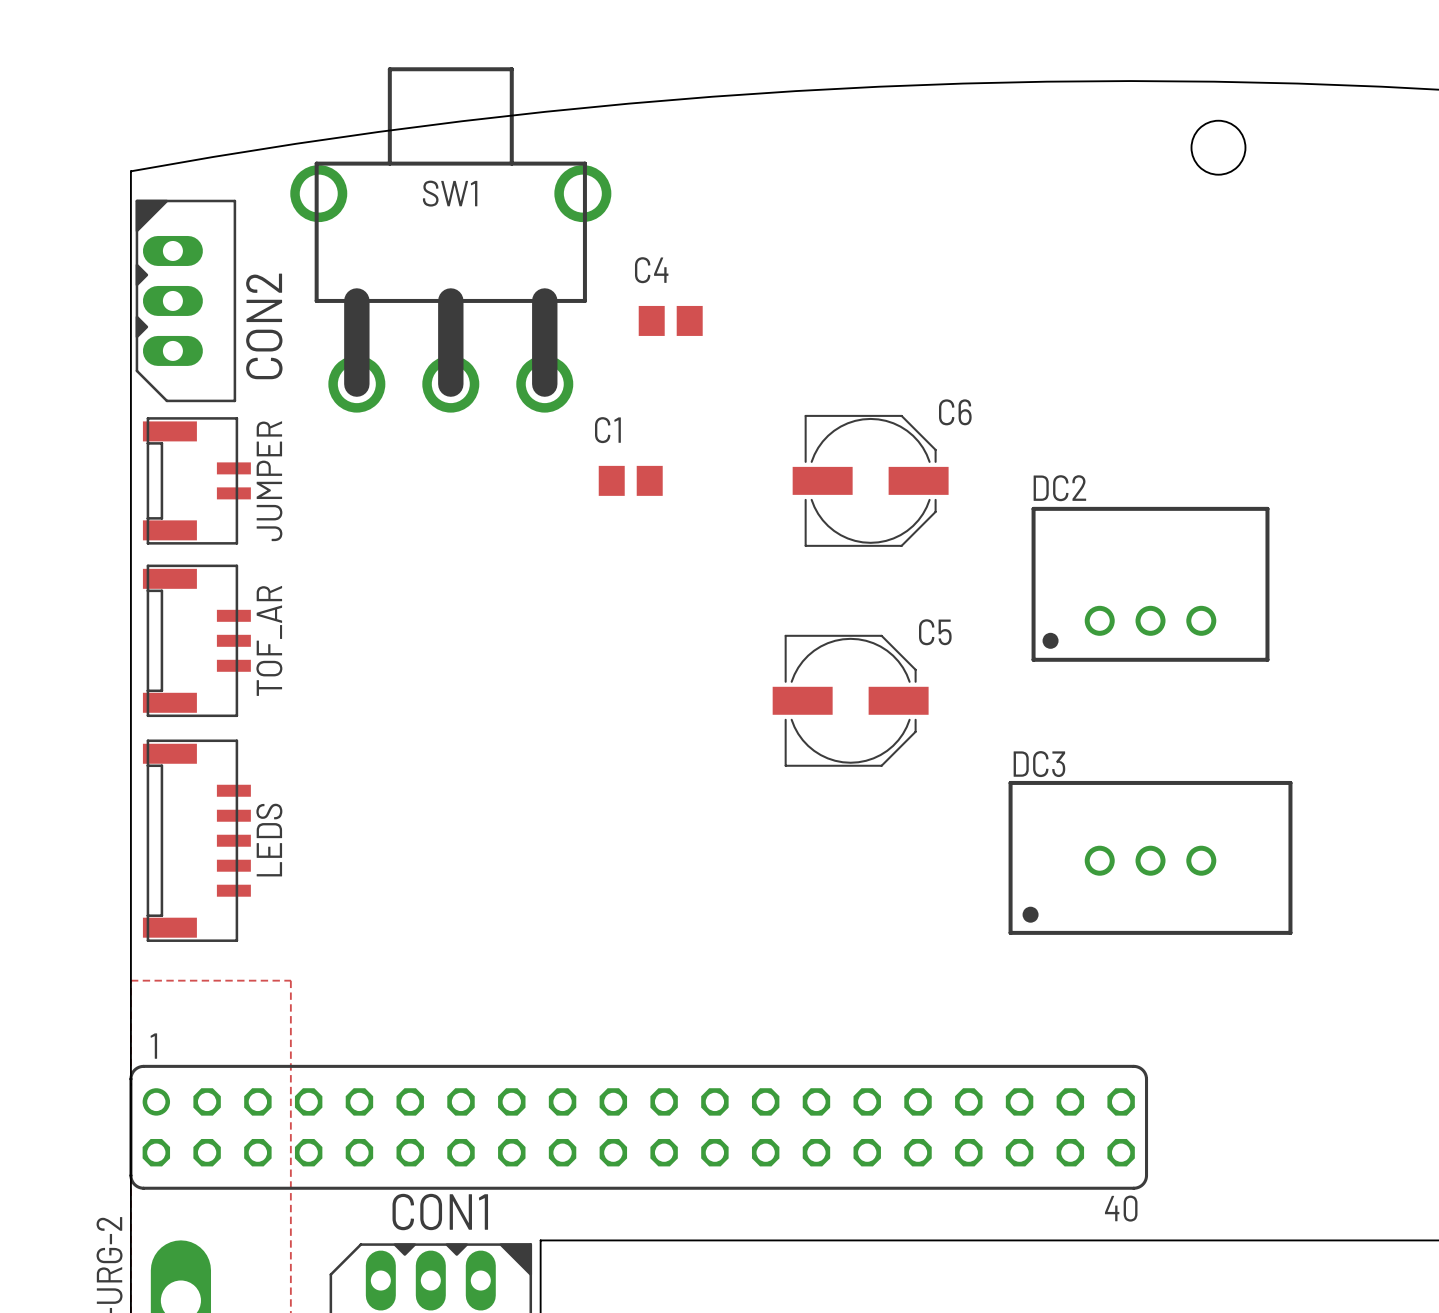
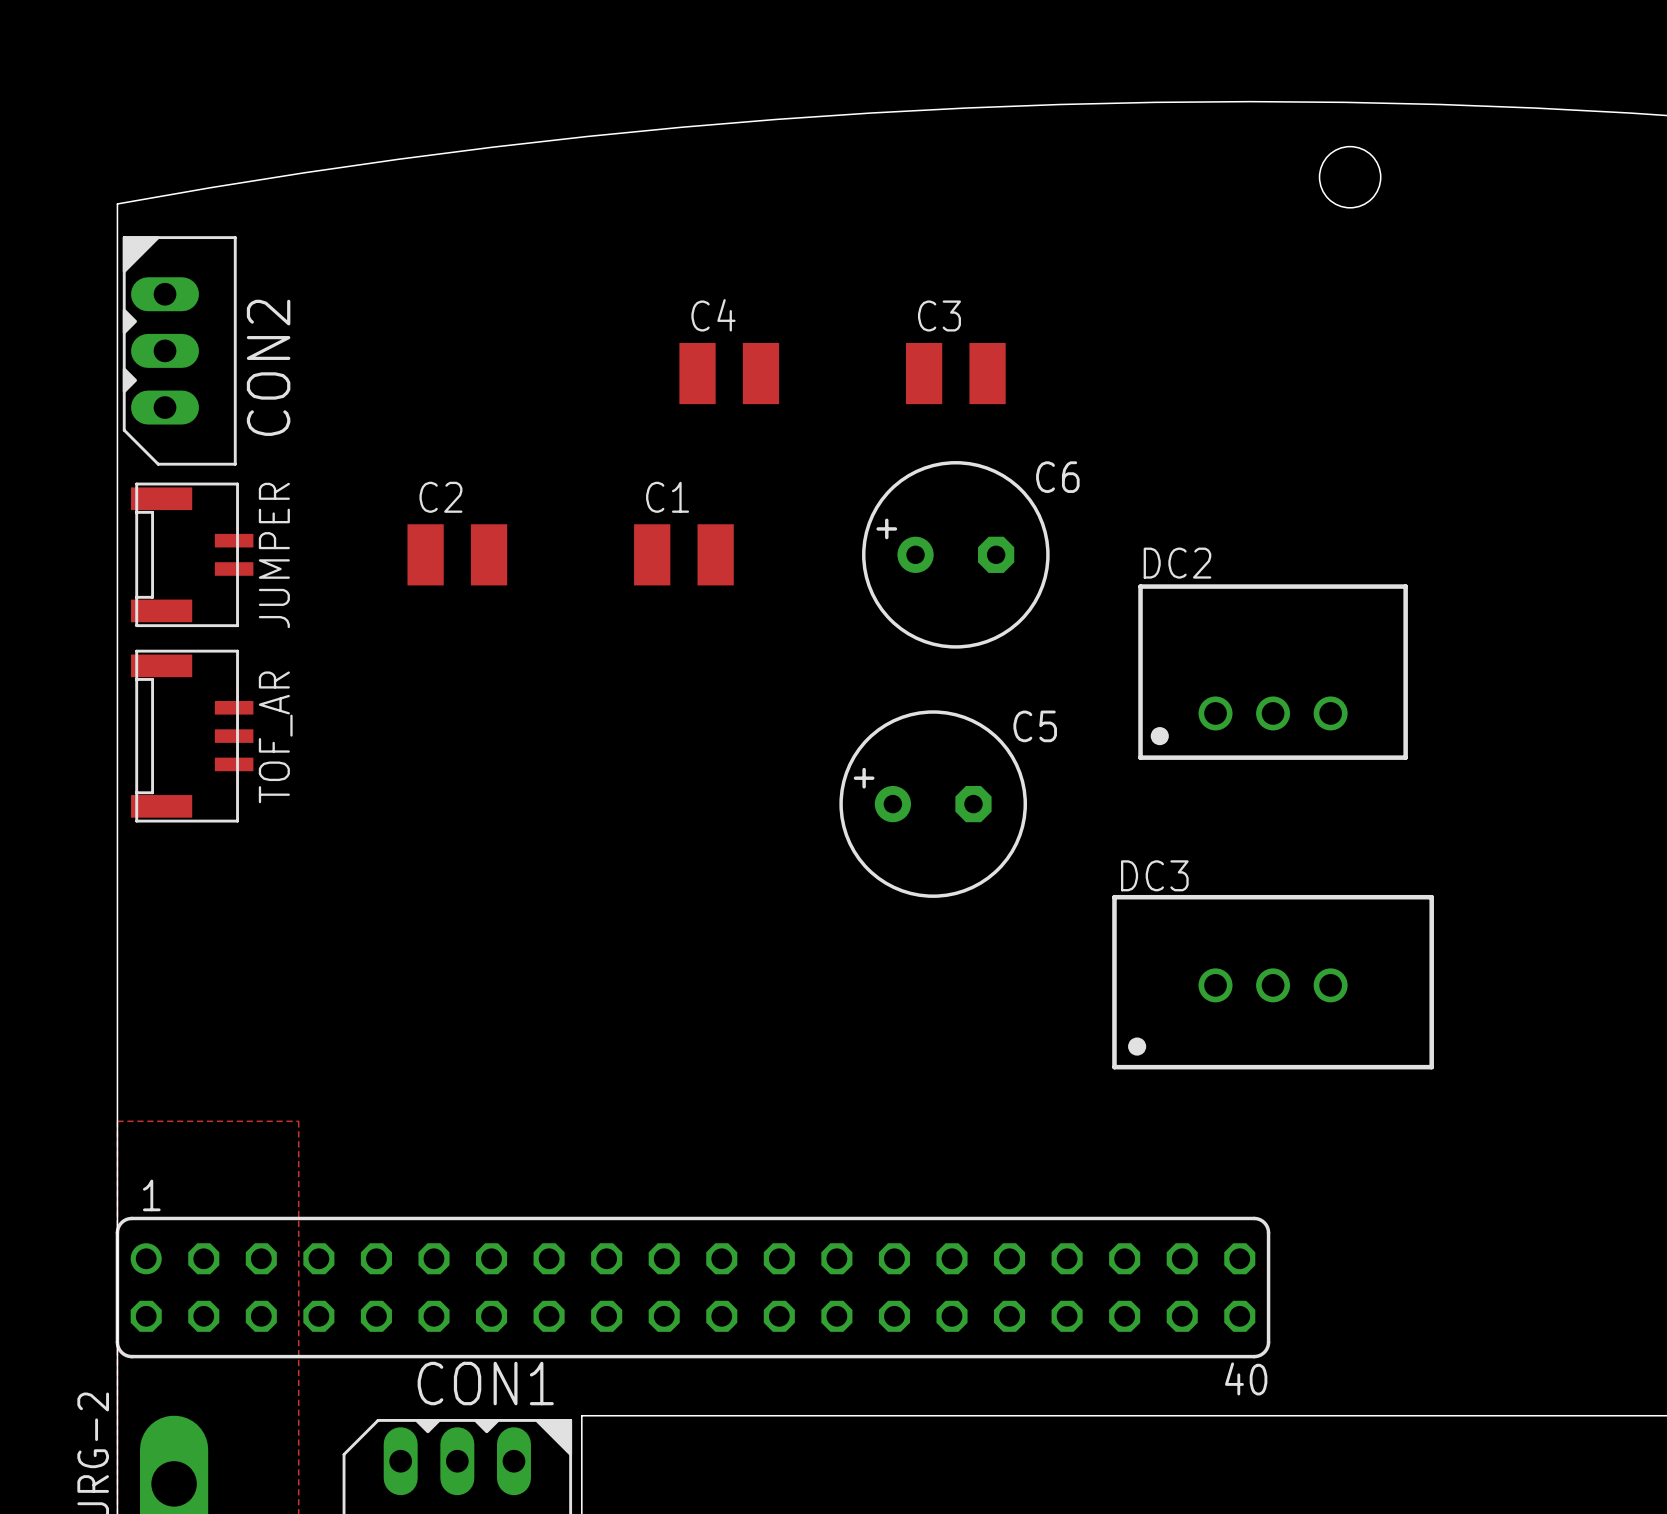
SW1: (450, 239) -> none
C4 footprint: [638, 305, 703, 336] -> [679, 342, 780, 405]
C3: none -> (955, 373)
C6 footprint: [792, 414, 949, 547] -> [862, 461, 1050, 649]
C1 footprint: [598, 465, 663, 496] -> [634, 524, 734, 586]
C2: none -> (457, 554)
C5 footprint: [772, 634, 929, 767] -> [839, 710, 1028, 898]
LEDS: (196, 840) -> none

